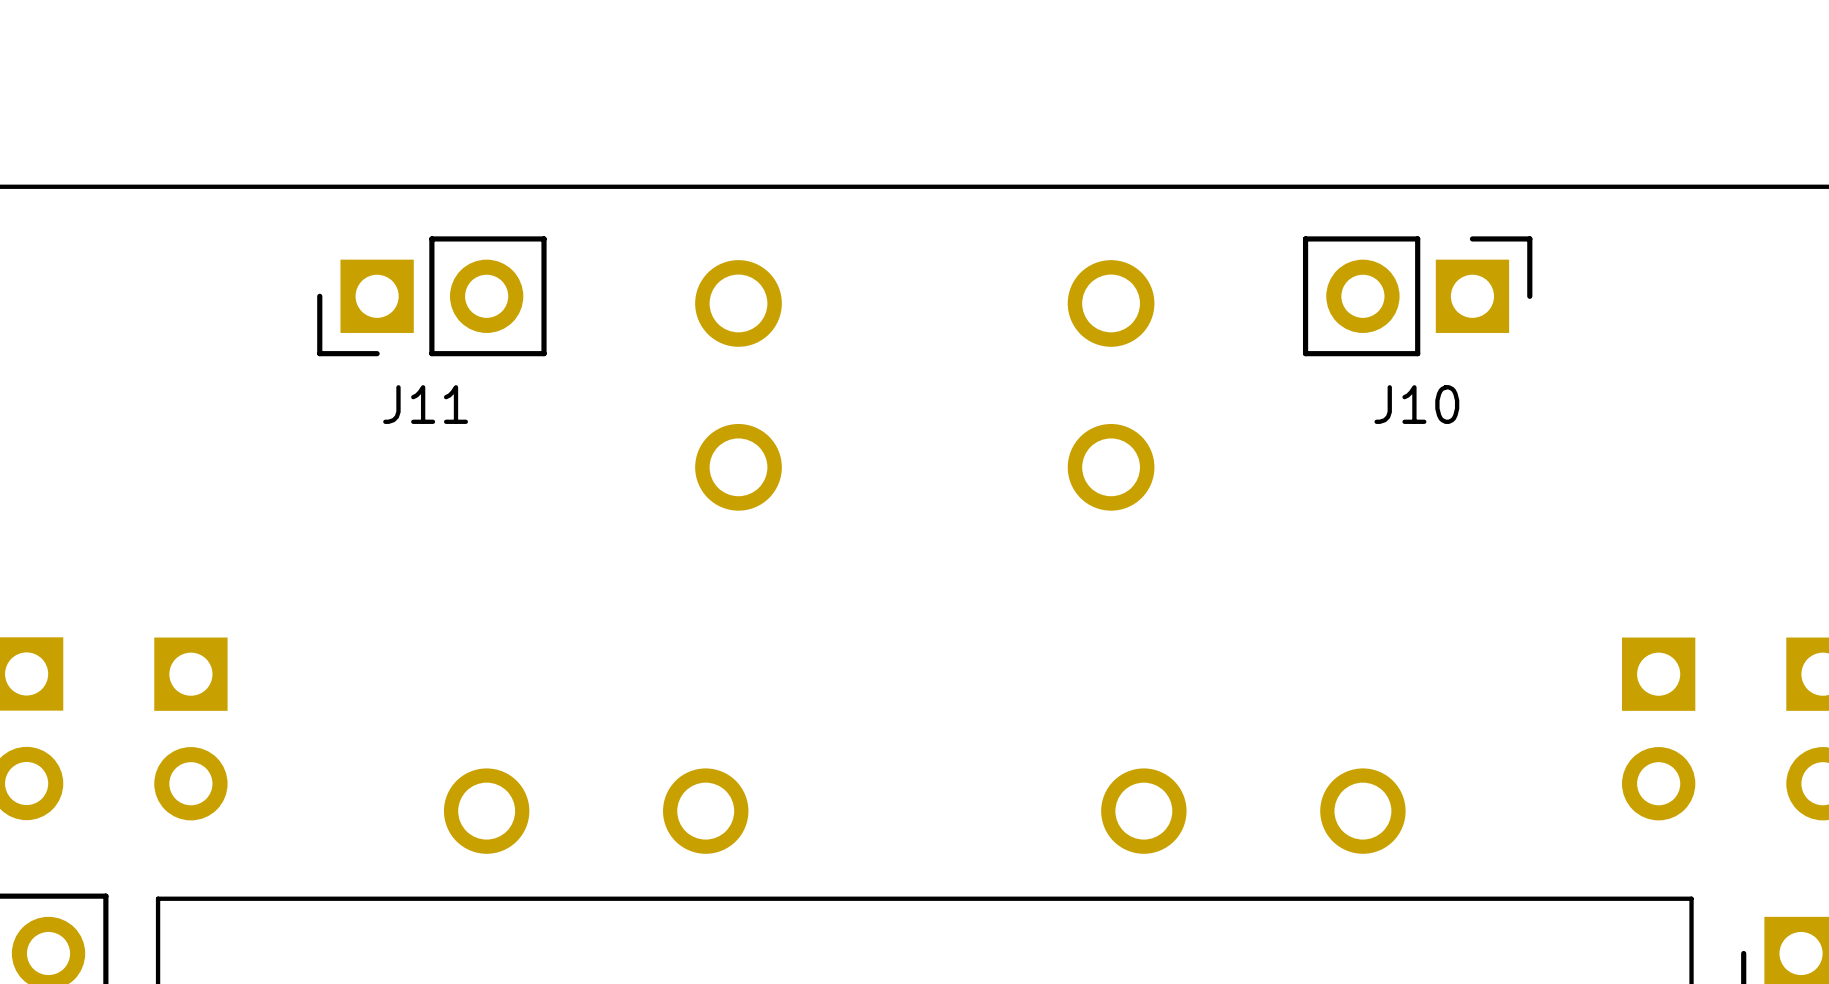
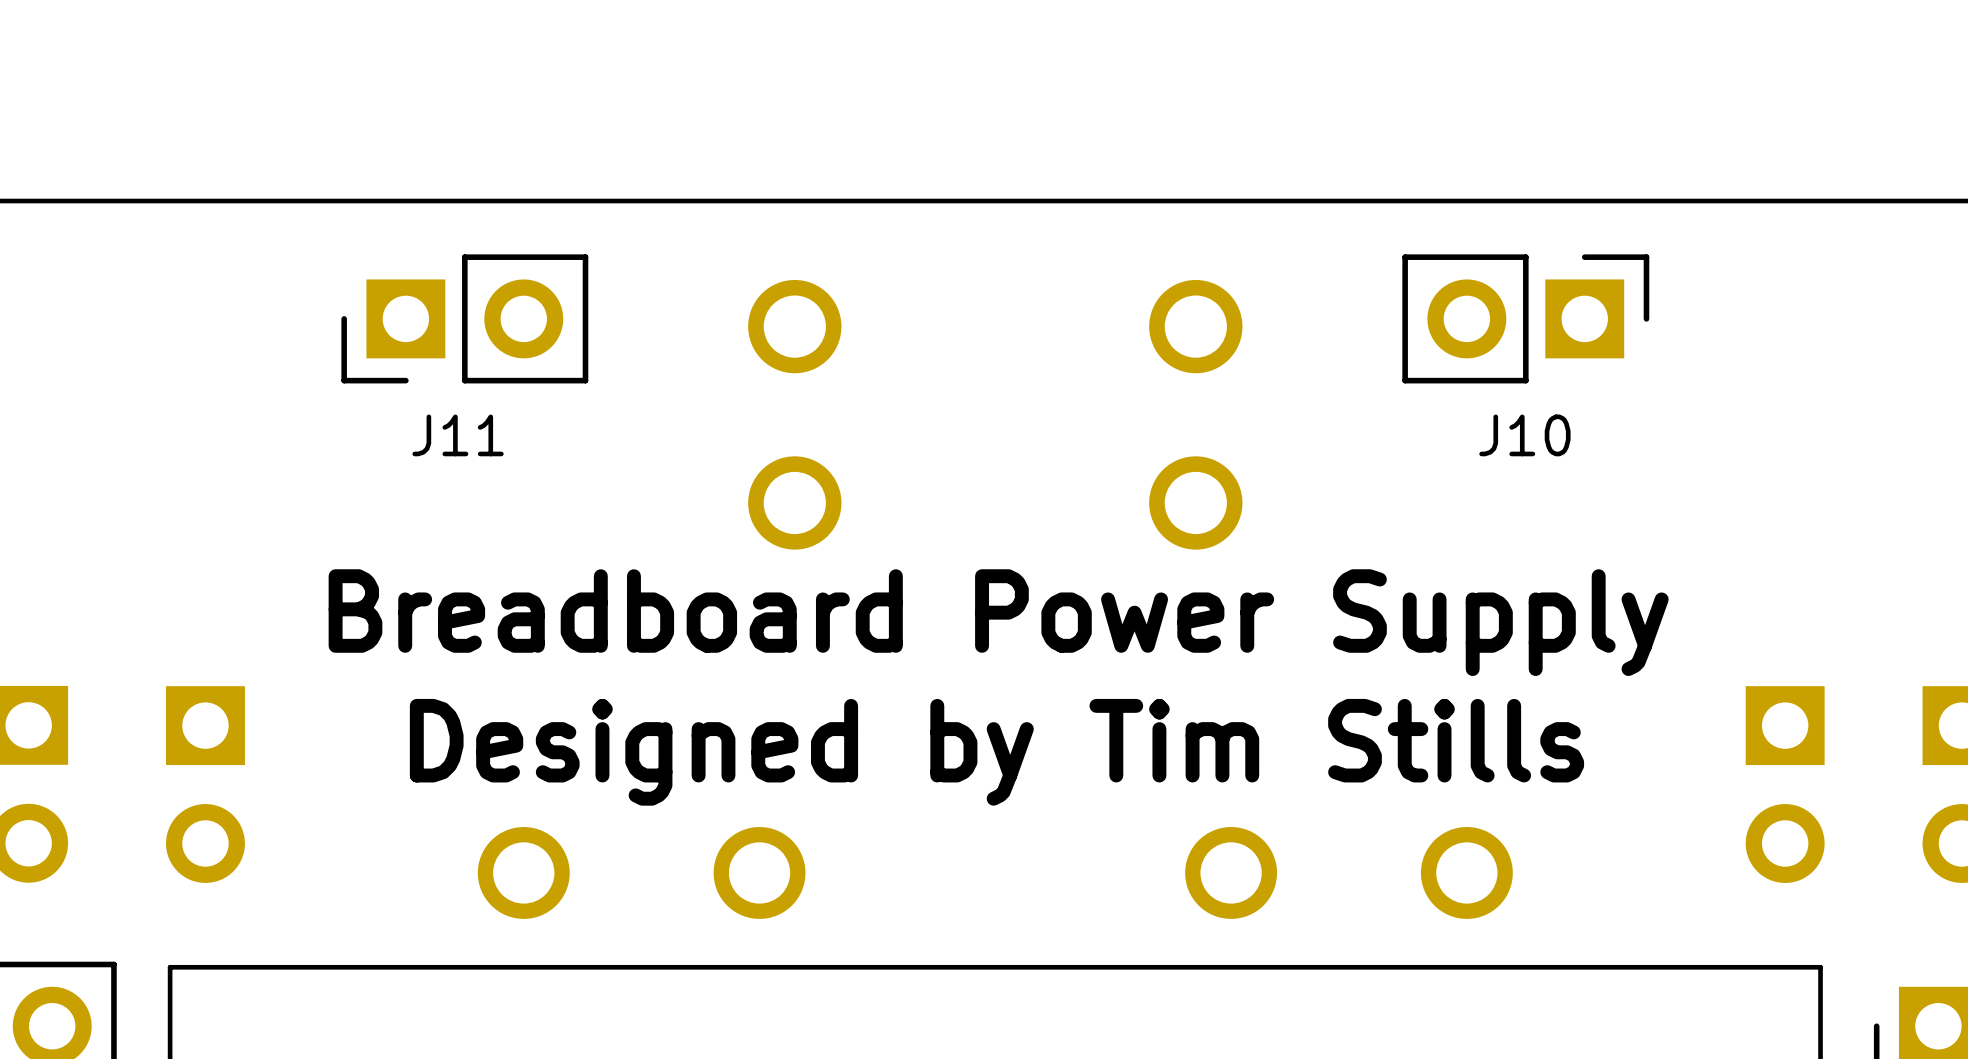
text: none -> Breadboard Power Supply (998, 622)
text: none -> Designed by Tim Stills (996, 752)

